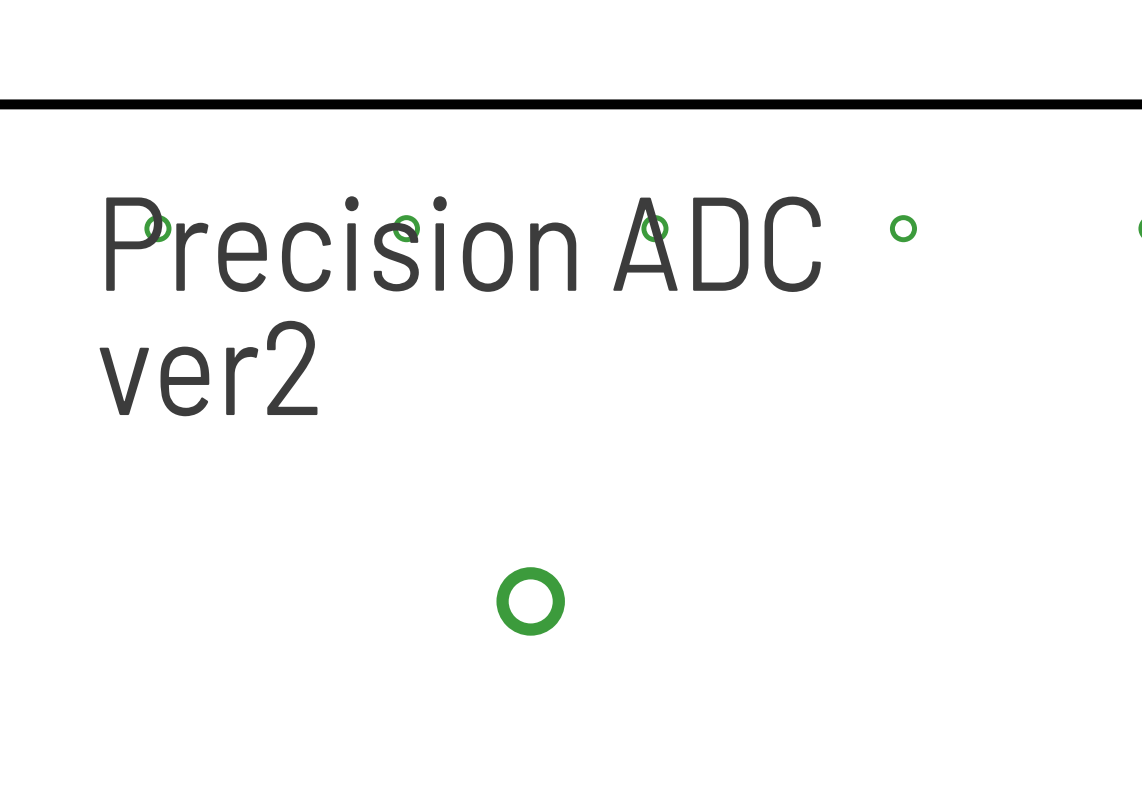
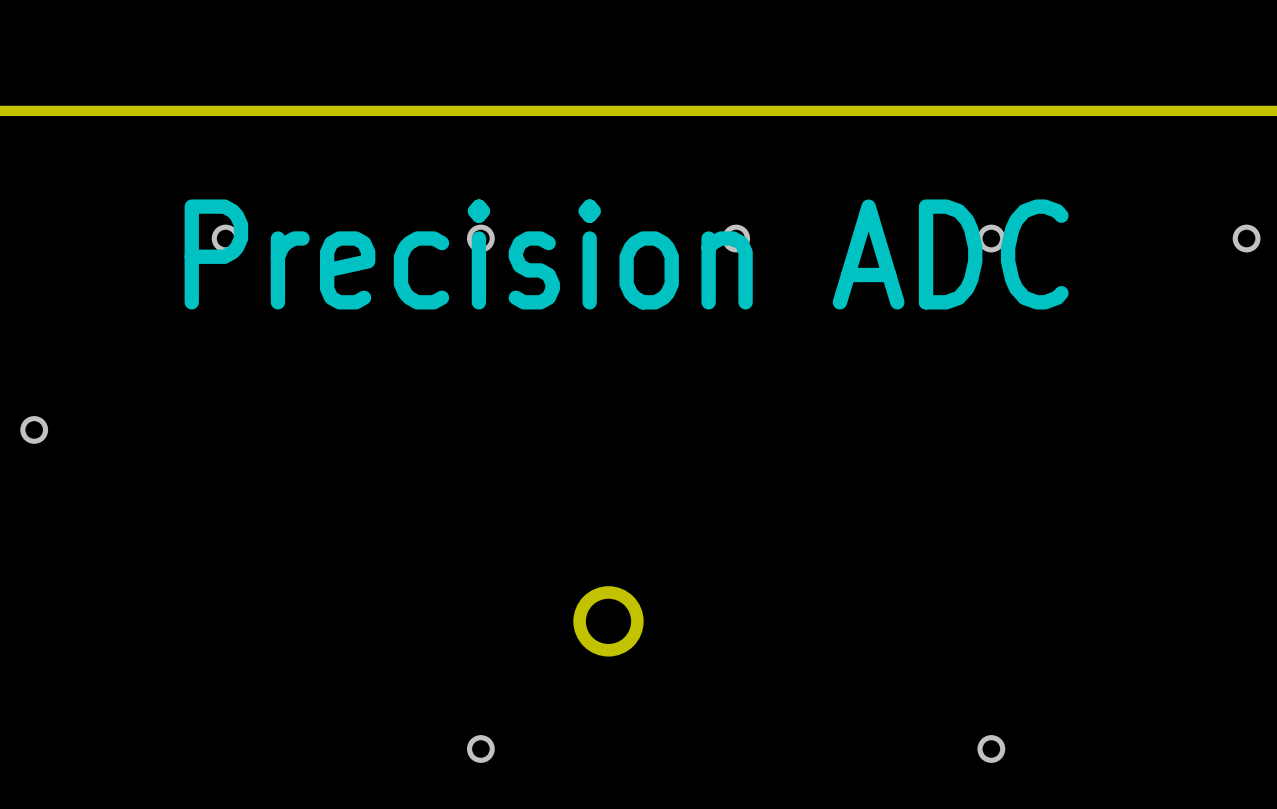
text: ver2 (208, 368) -> none
via: none -> (480, 748)
via: none -> (991, 748)

